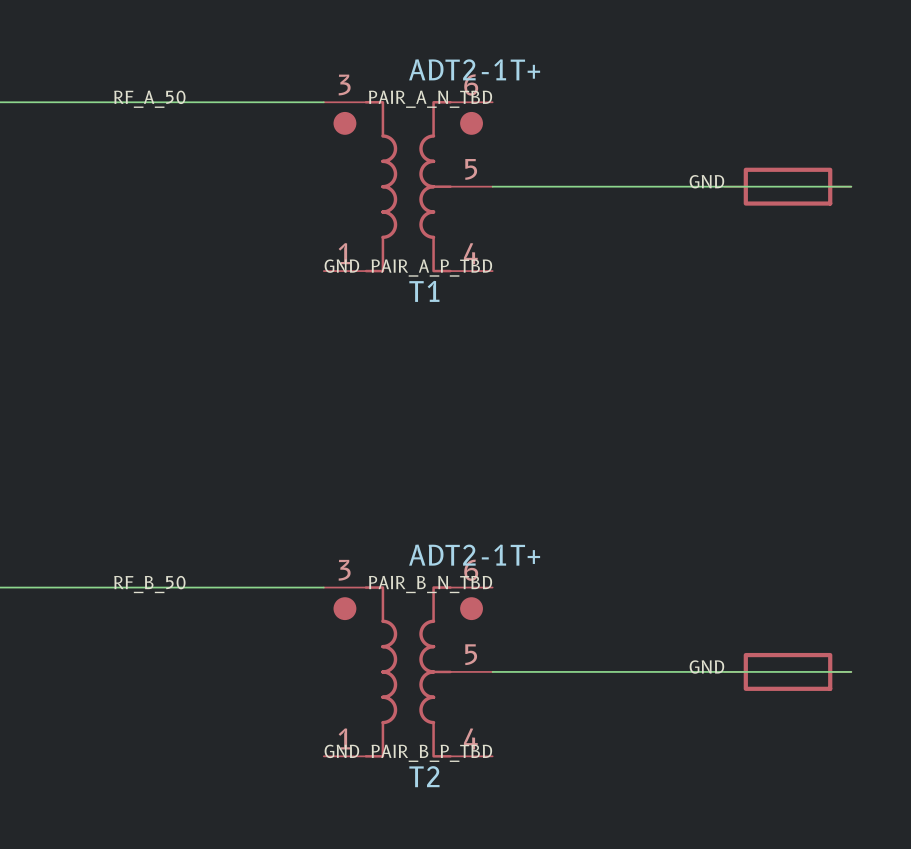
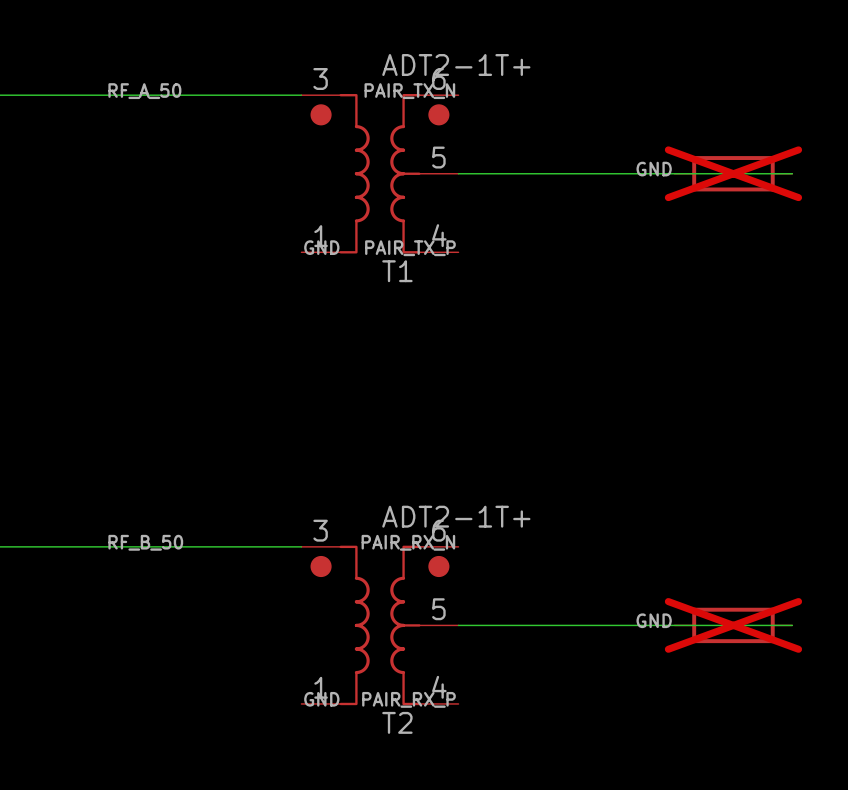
label: PAIR_A_N_TBD (430, 99) -> PAIR_TX_N (409, 91)
part do-not-place cross: none -> (733, 173)
label: PAIR_A_P_TBD (431, 268) -> PAIR_TX_P (410, 248)
label: PAIR_B_N_TBD (430, 584) -> PAIR_RX_N (408, 542)
part do-not-place cross: none -> (733, 625)
label: PAIR_B_P_TBD (431, 753) -> PAIR_RX_P (408, 699)

